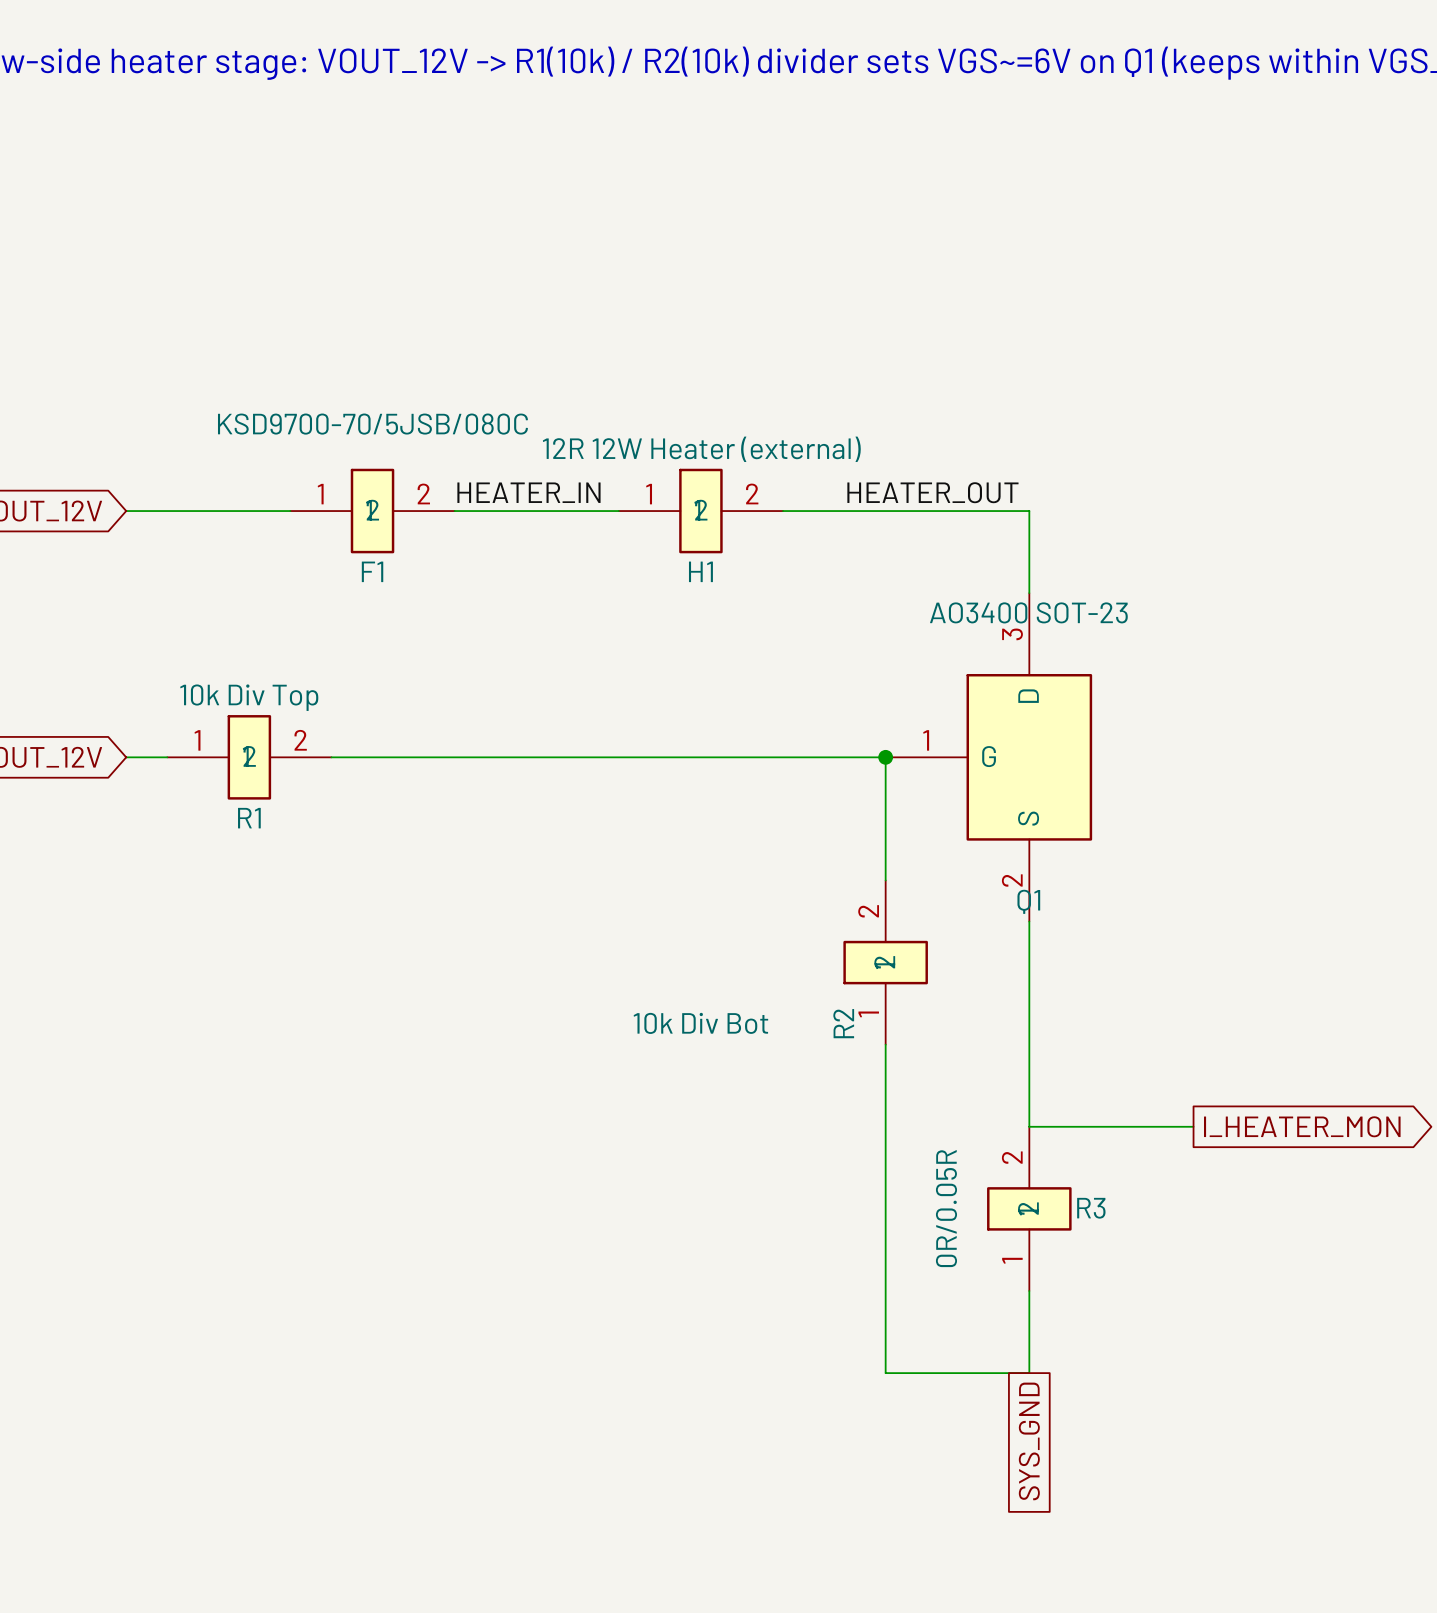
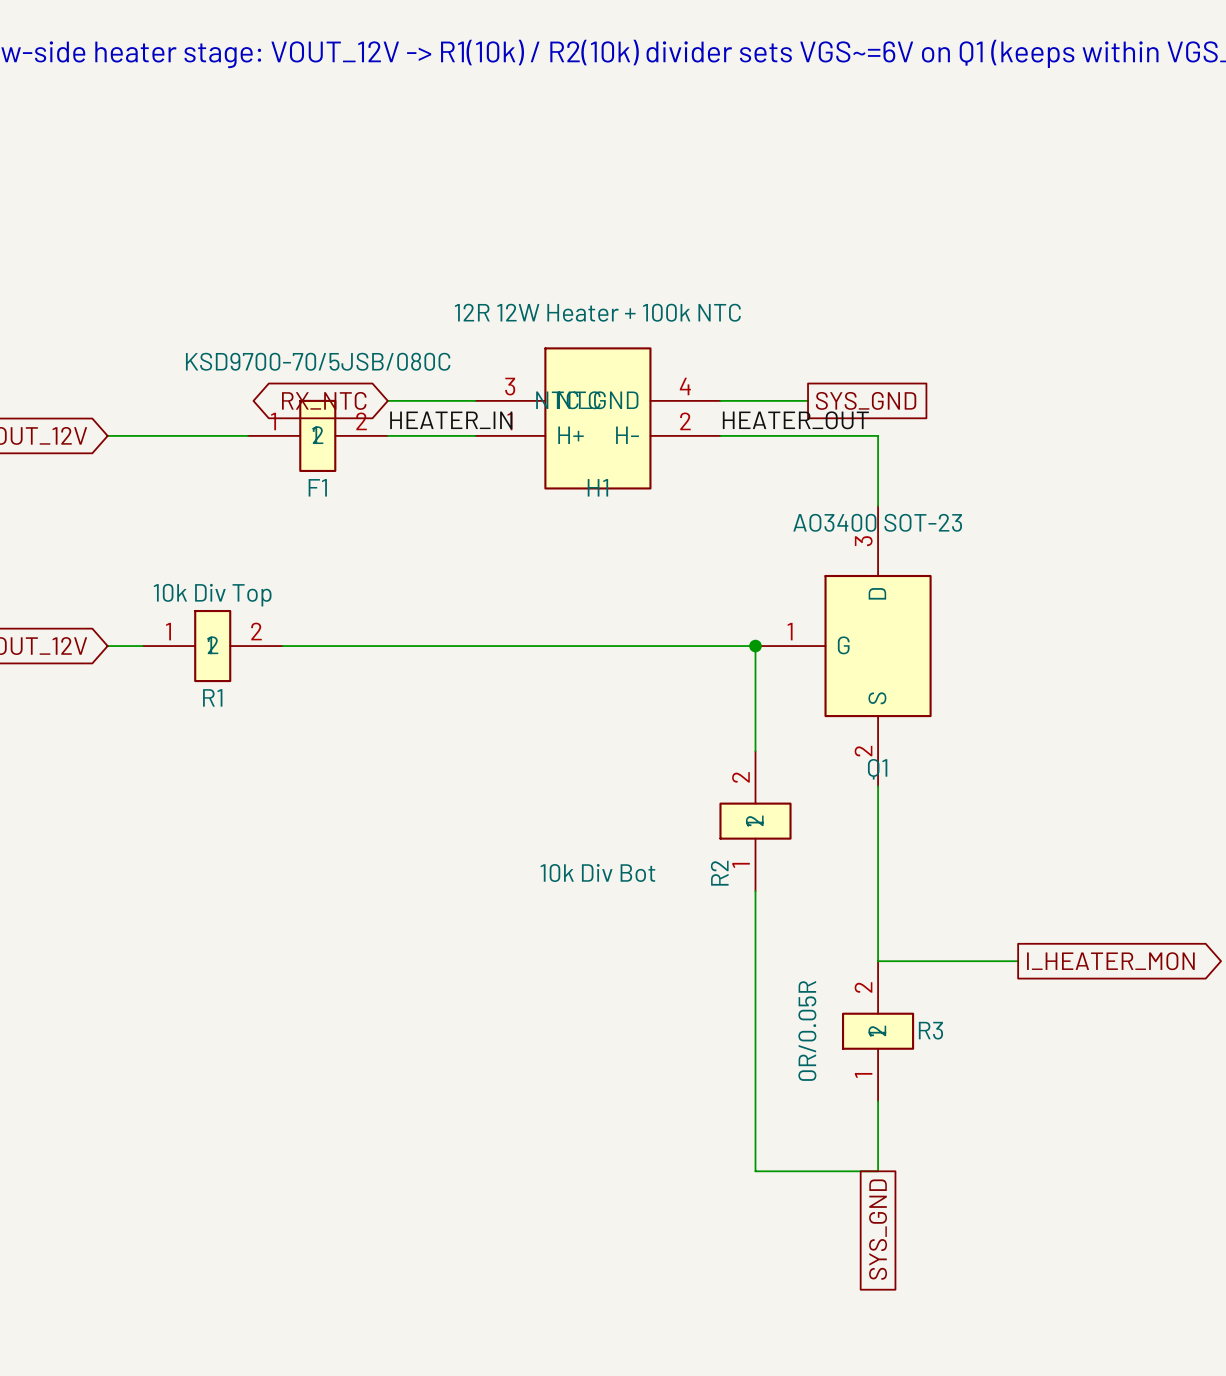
H1 value: 12R 12W Heater (external) (701, 449) -> 12R 12W Heater + 100k NTC (597, 312)
H1 symbol: [618, 468, 784, 554] -> [475, 347, 721, 490]
wire: none -> (387, 400) (475, 400)
wire: none -> (720, 400) (808, 400)
global label: none -> SYS_GND (866, 400)
global label: none -> RX_NTC (324, 400)

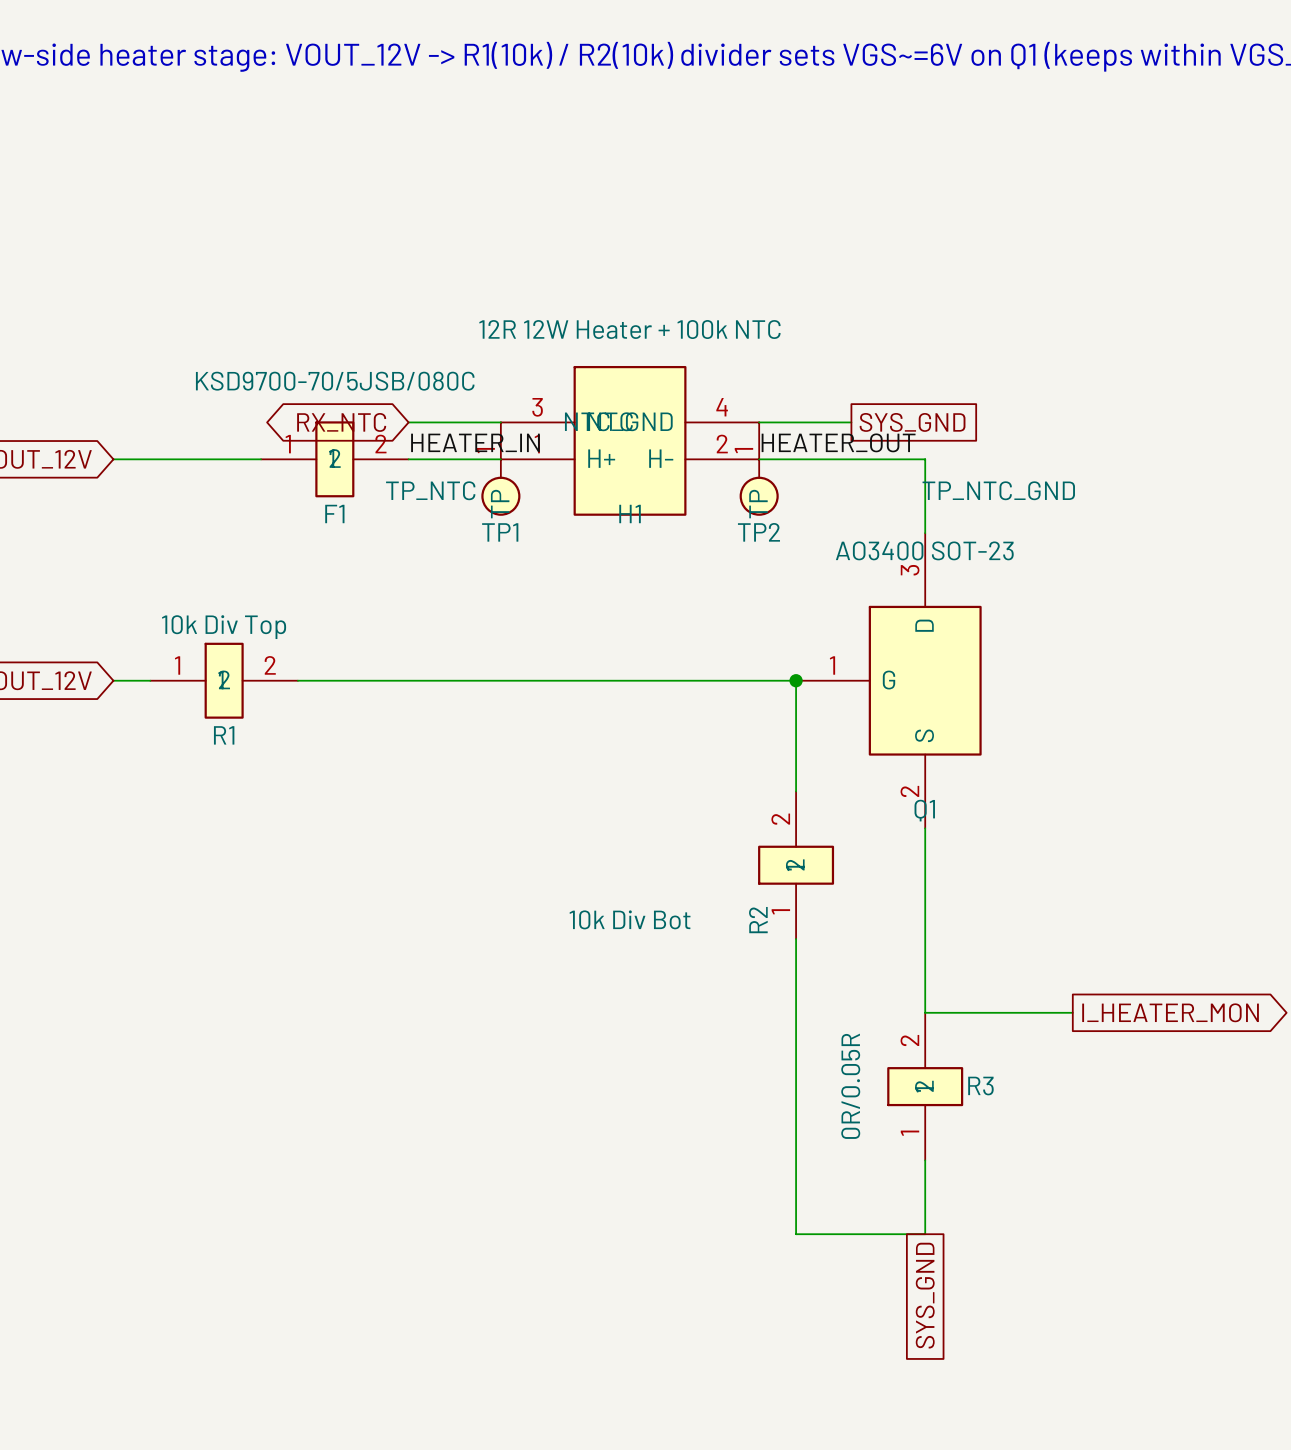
TP1: none -> TP_NTC (500, 469)
TP2: none -> TP_NTC_GND (759, 469)

